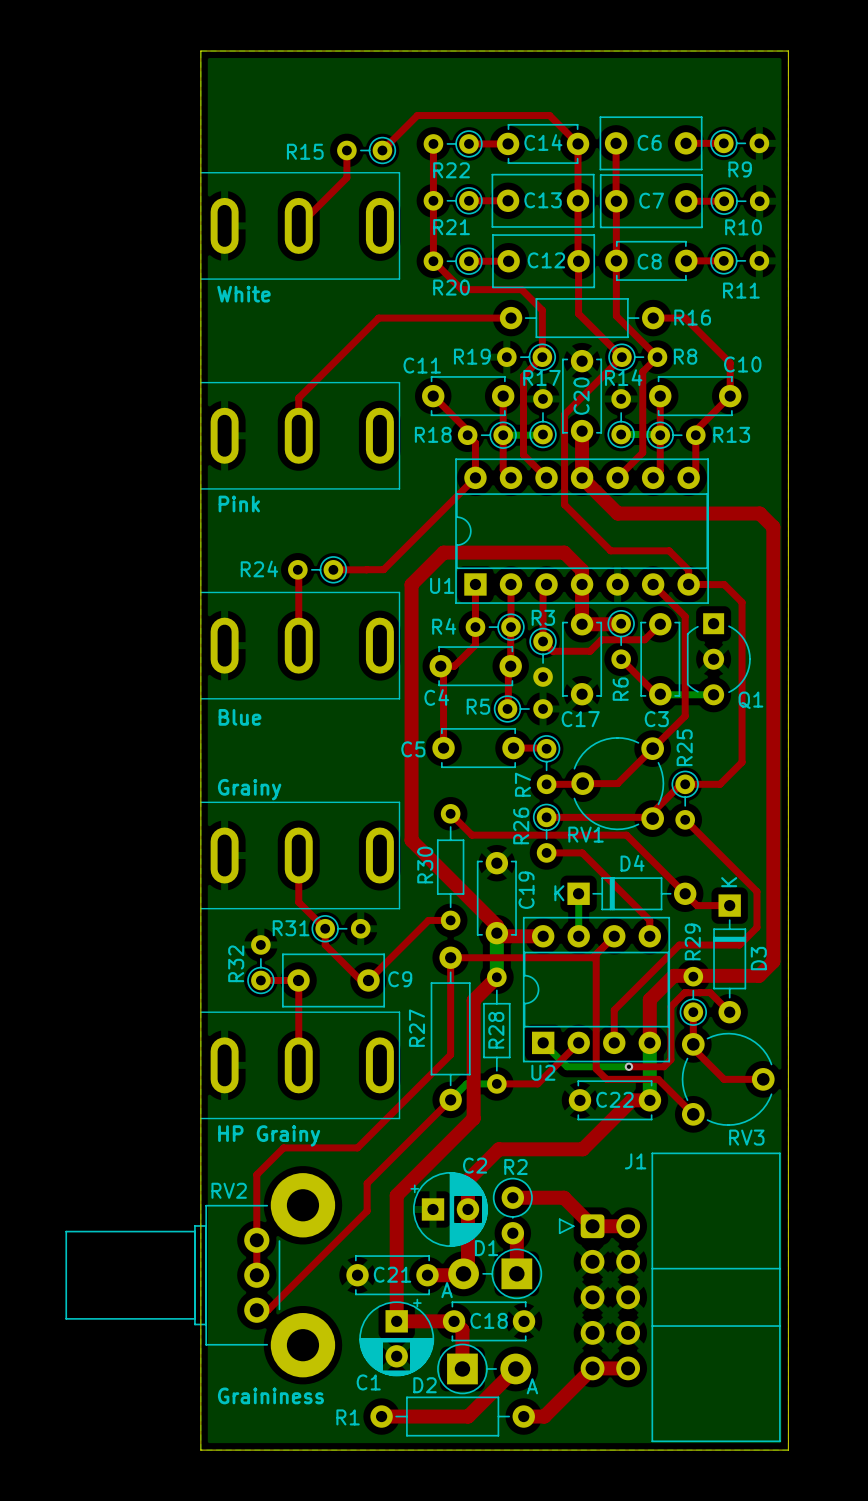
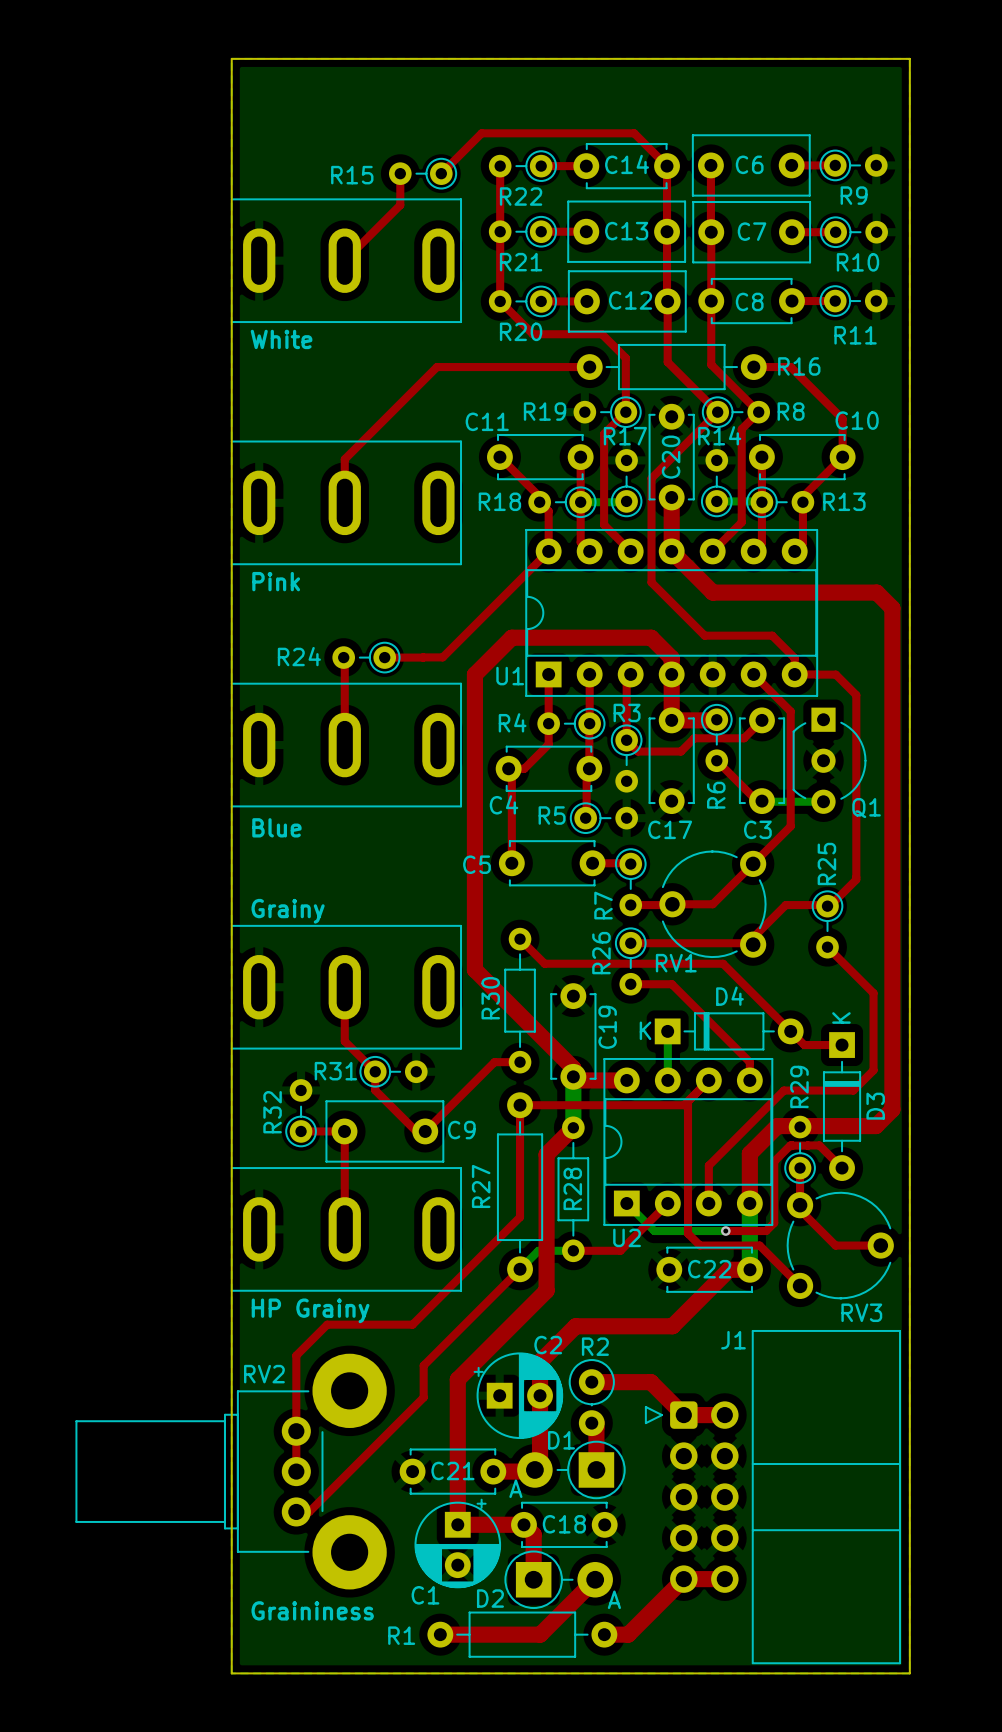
R25 position: (685, 800) -> (827, 924)
top track: (685, 819) (756, 891) -> (826, 946) (873, 993) (873, 1028)

